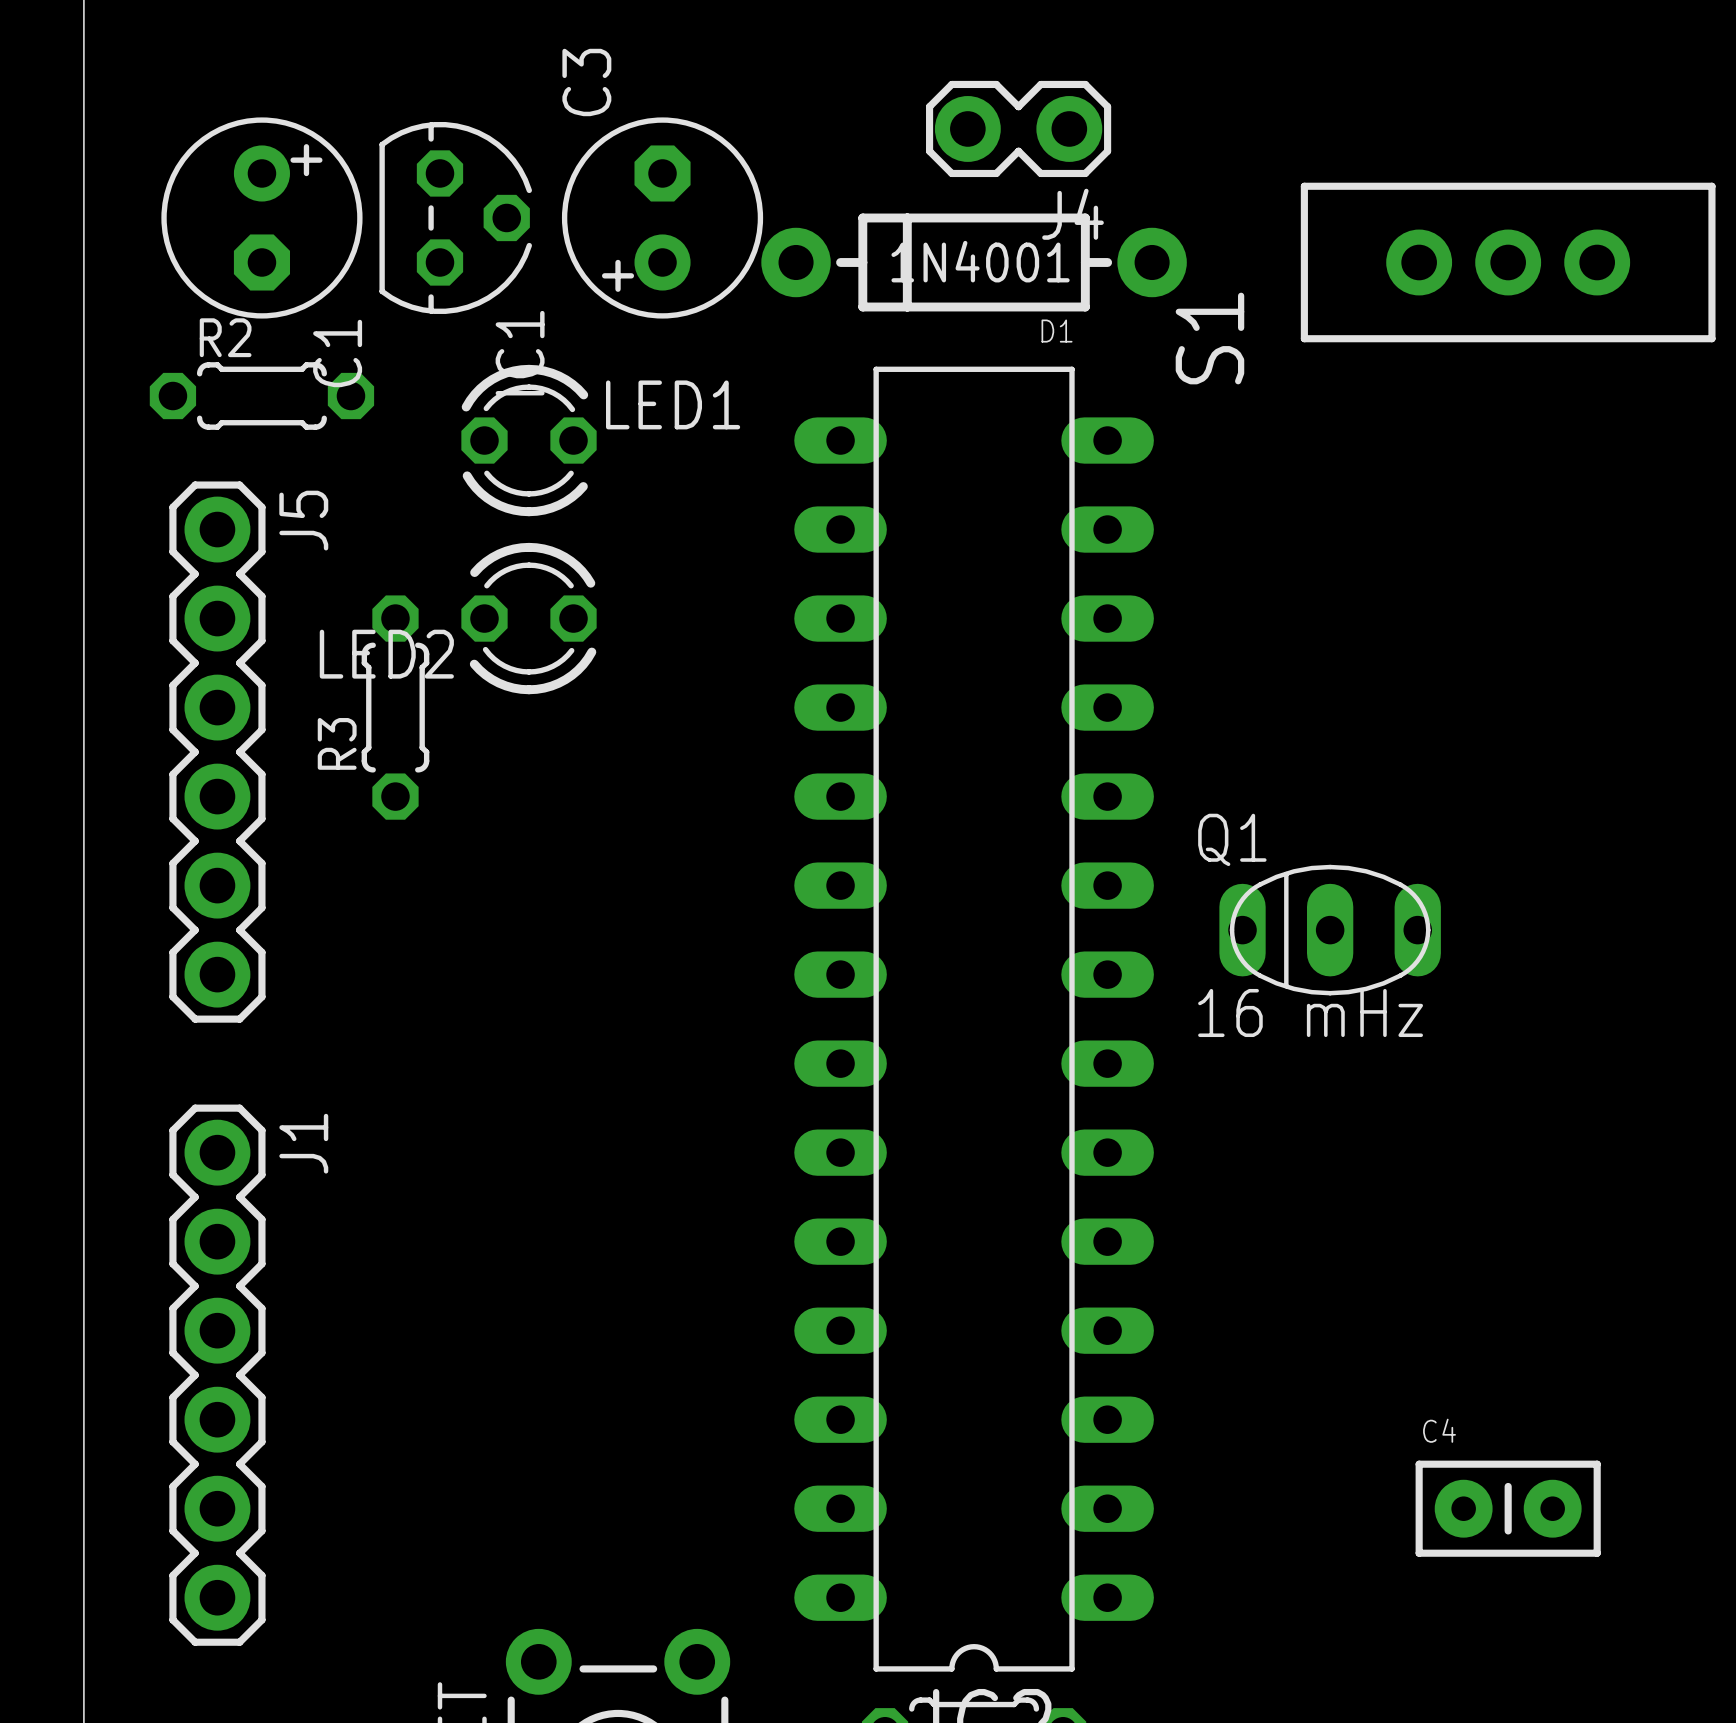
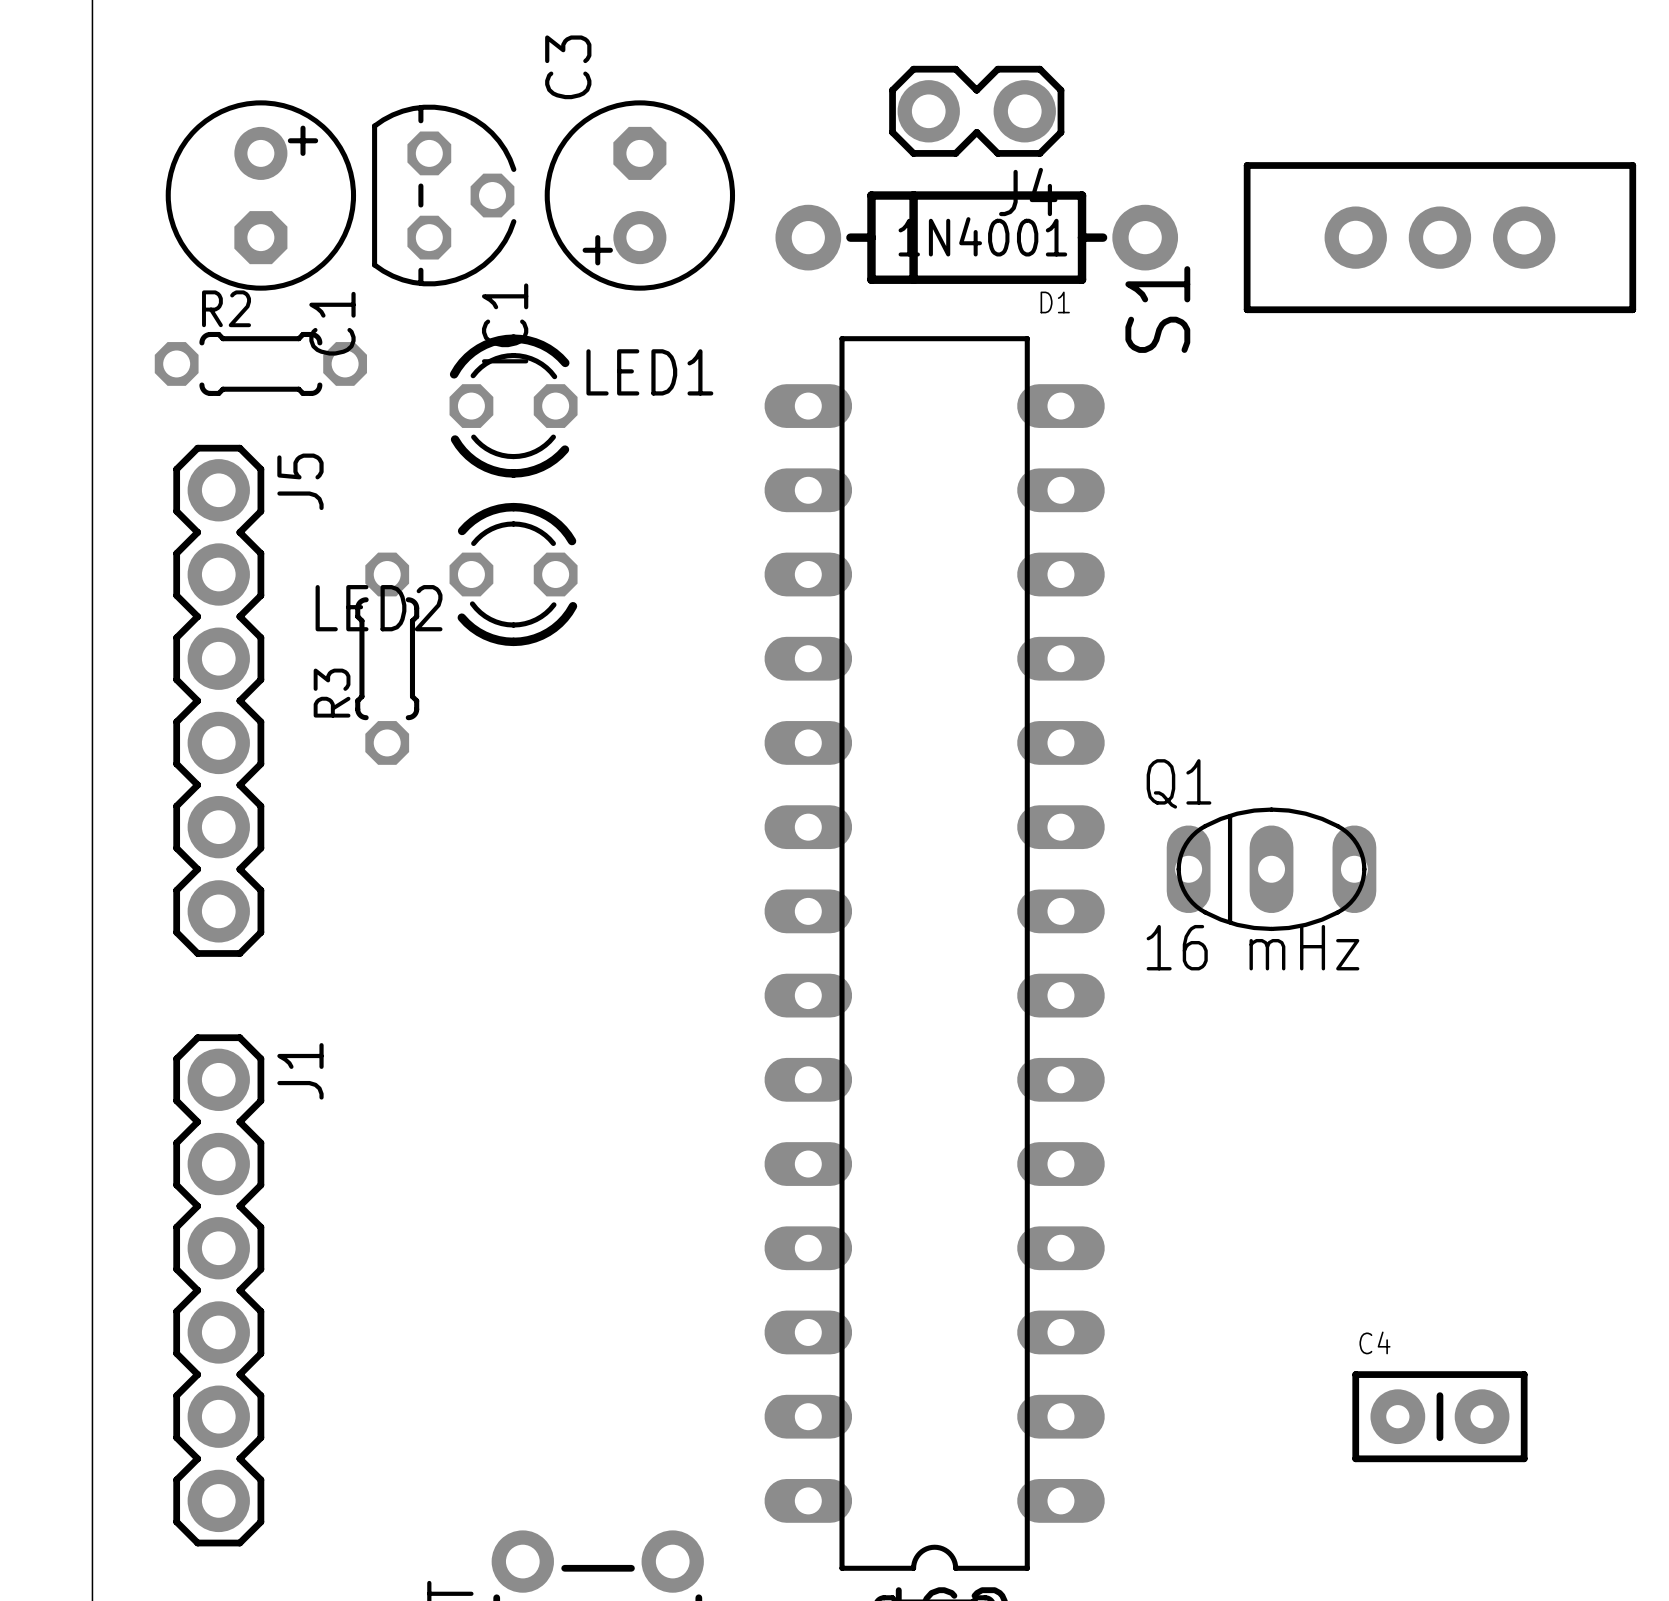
D1 position: (974, 262) -> (976, 237)

